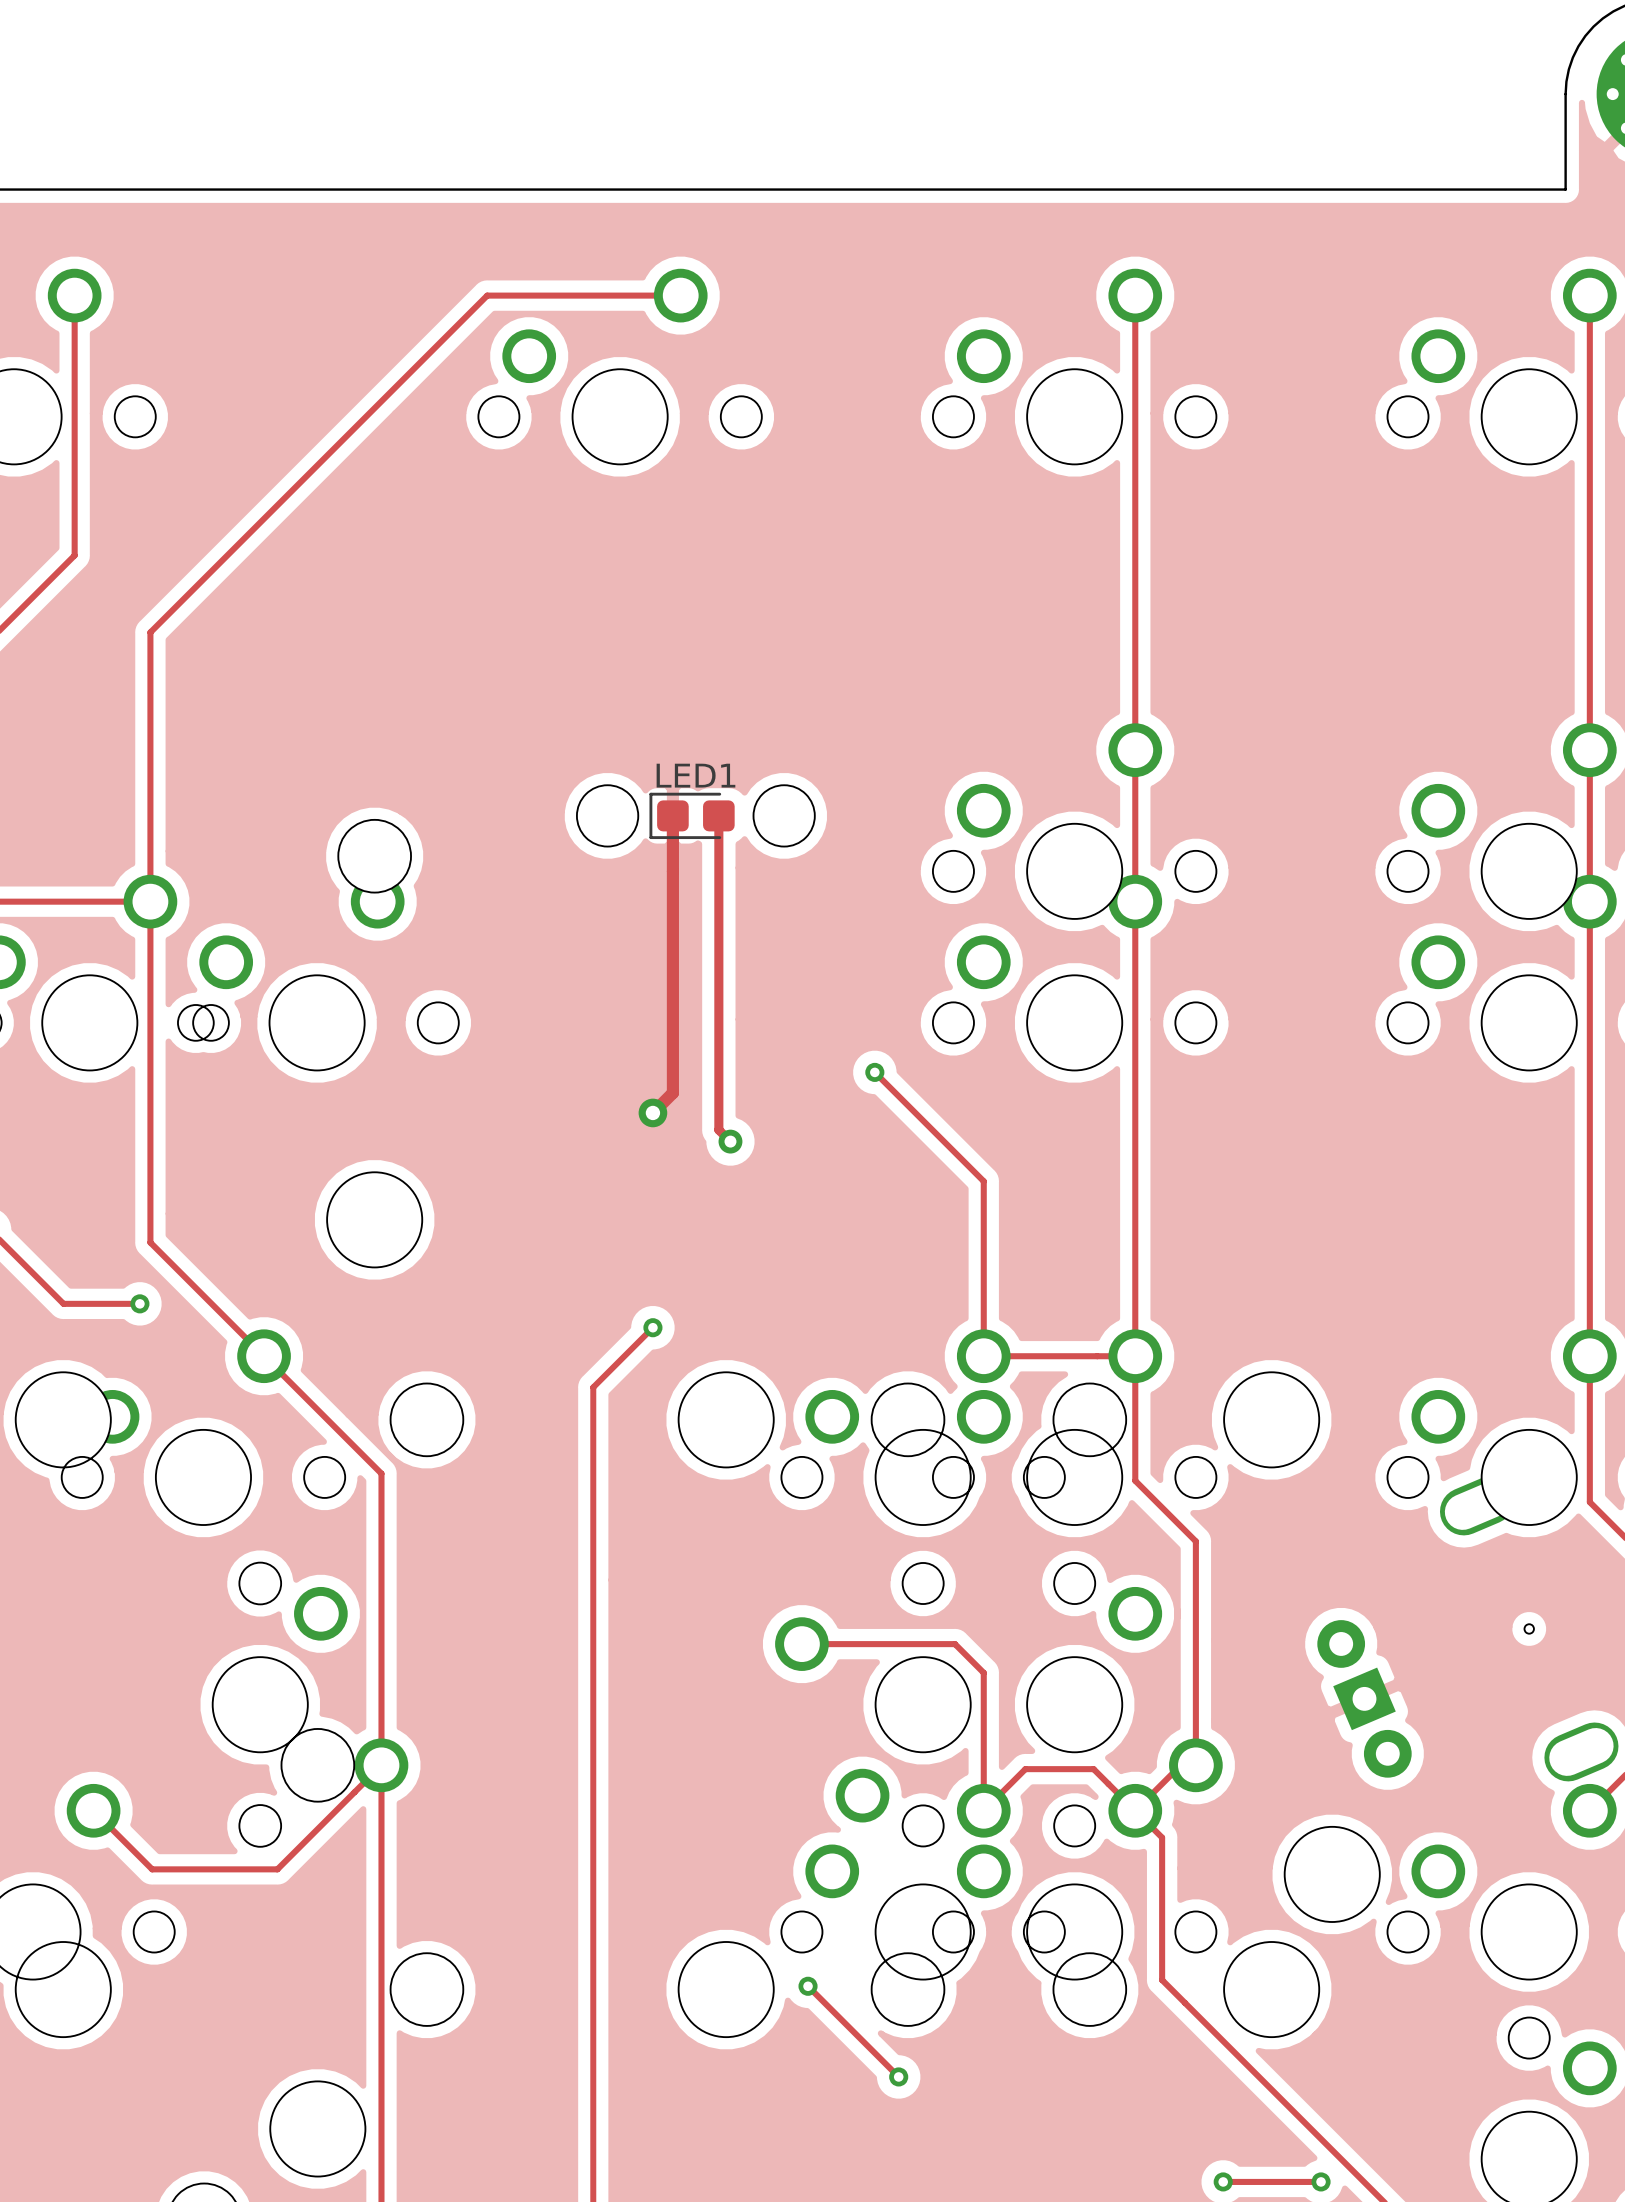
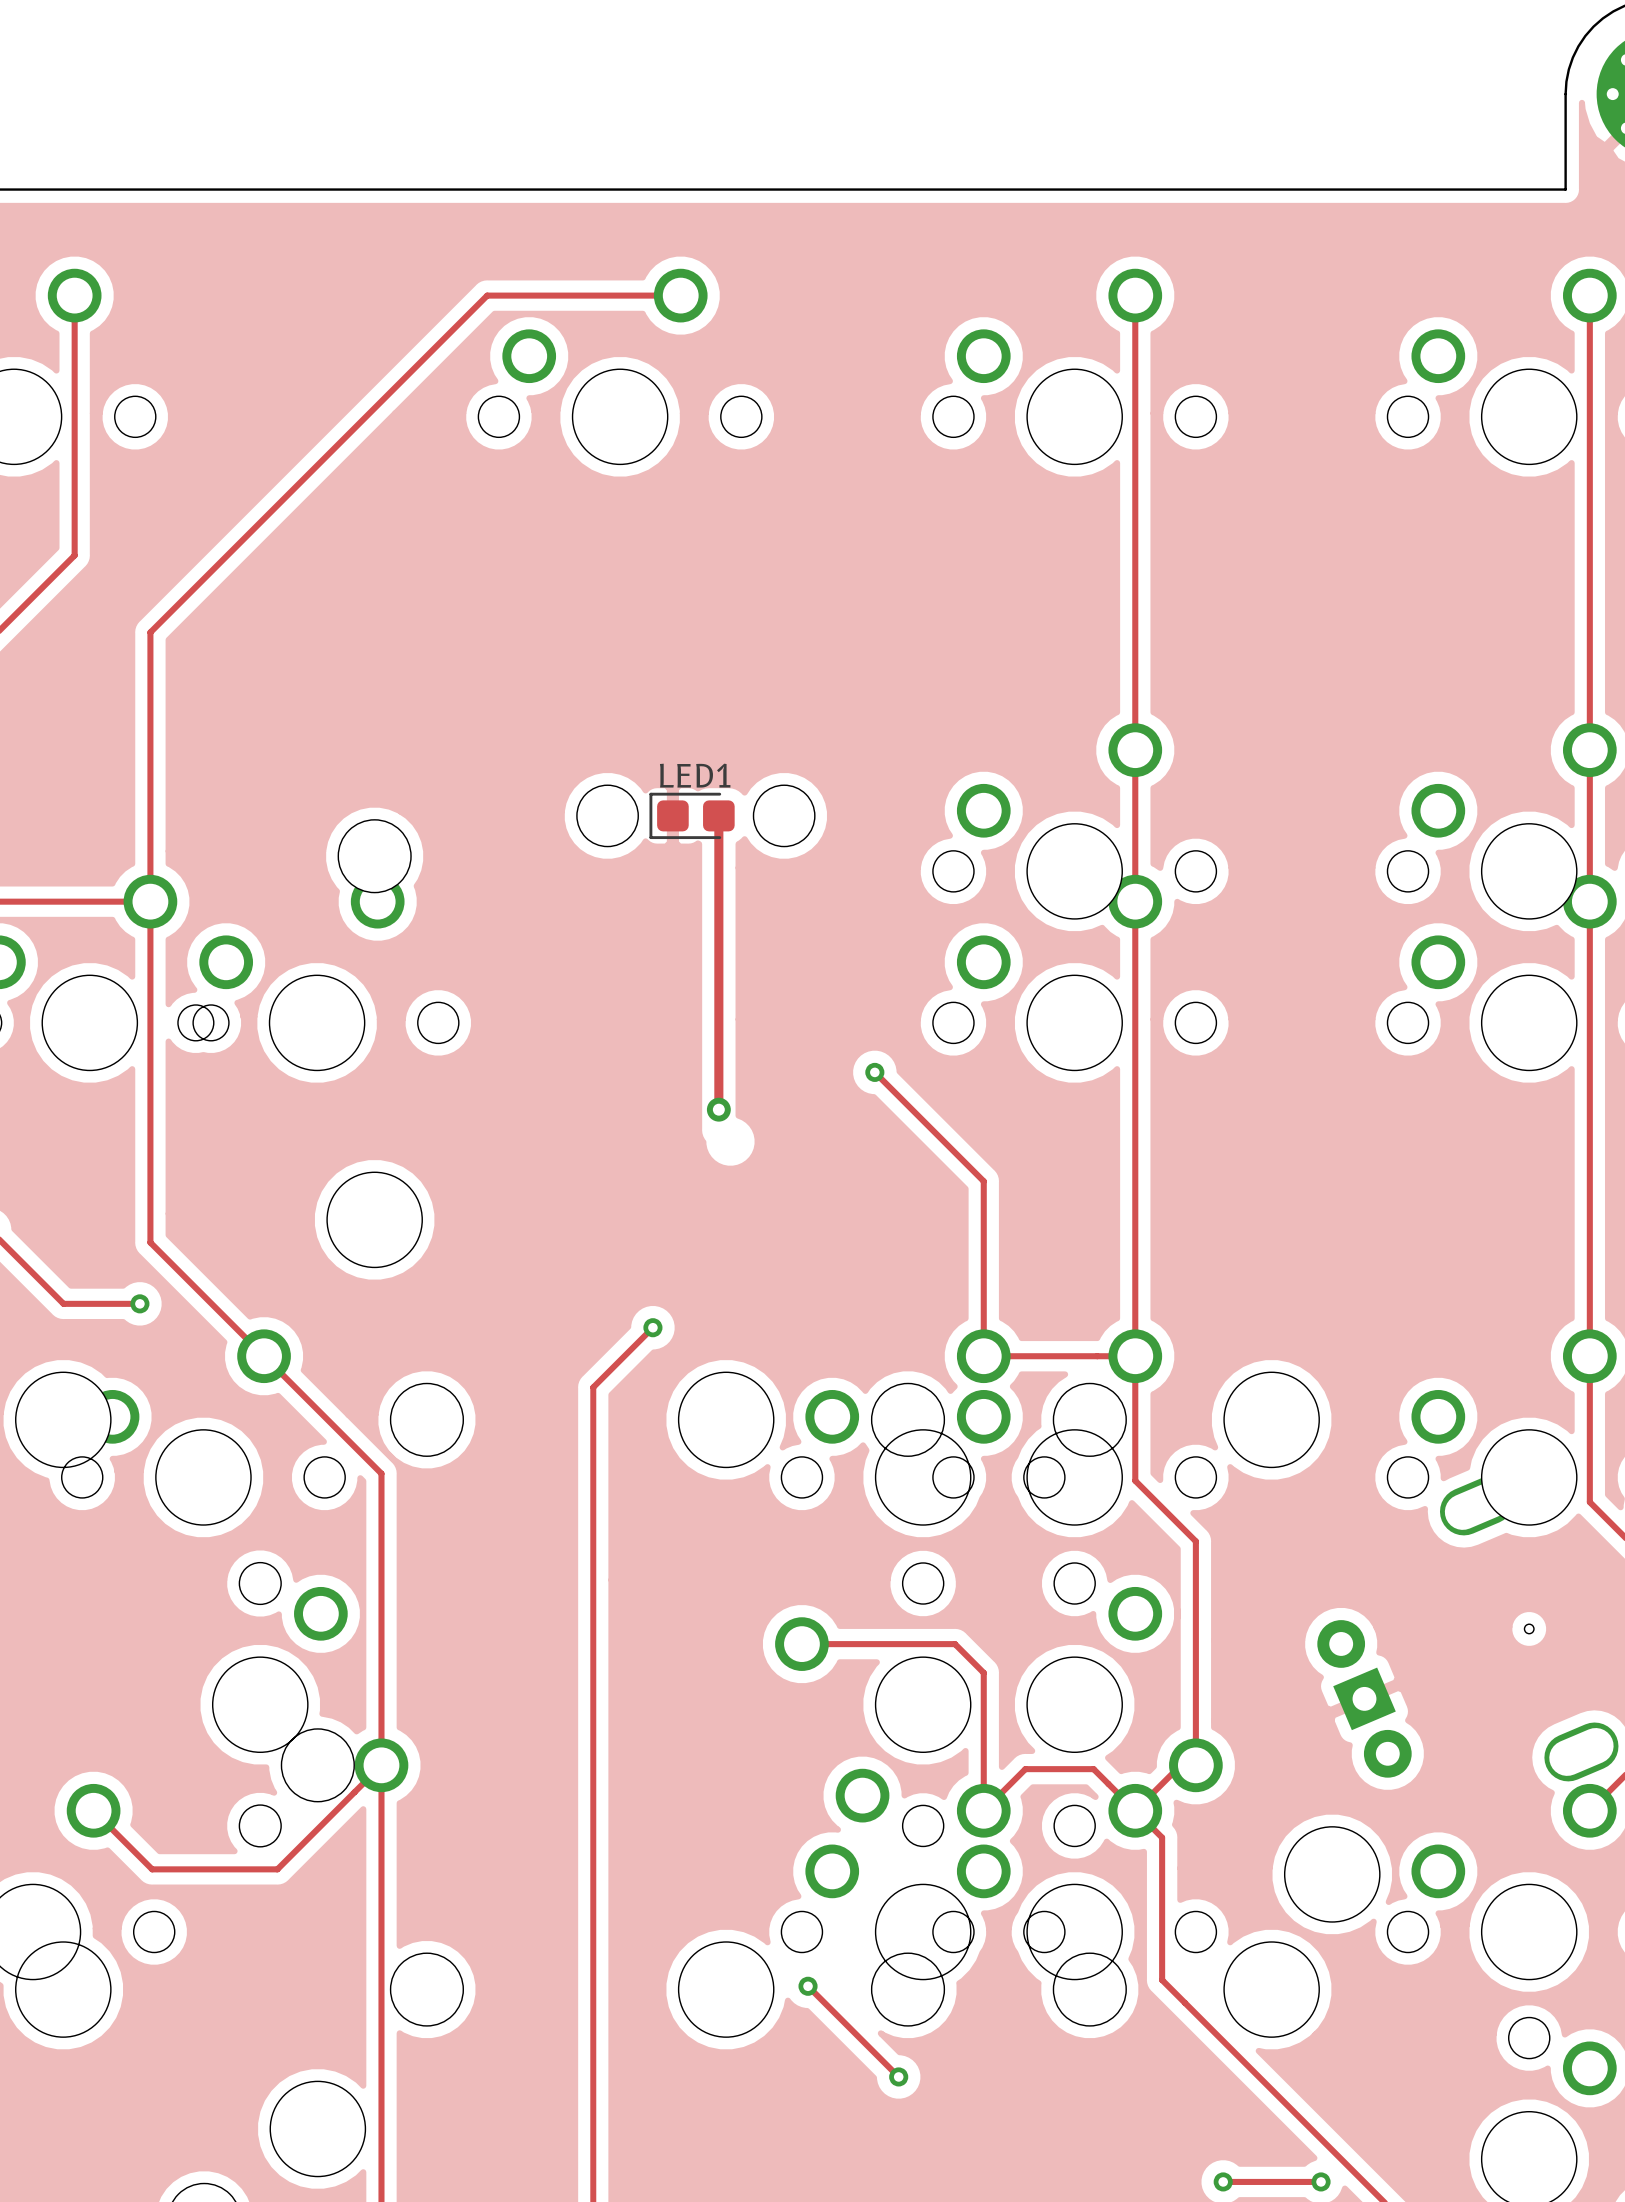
track: (672, 815) (672, 1092) (652, 1112) -> none
track: (718, 1109) (718, 1129) (730, 1141) -> none
via: (652, 1112) -> none
via position: (730, 1141) -> (718, 1109)

